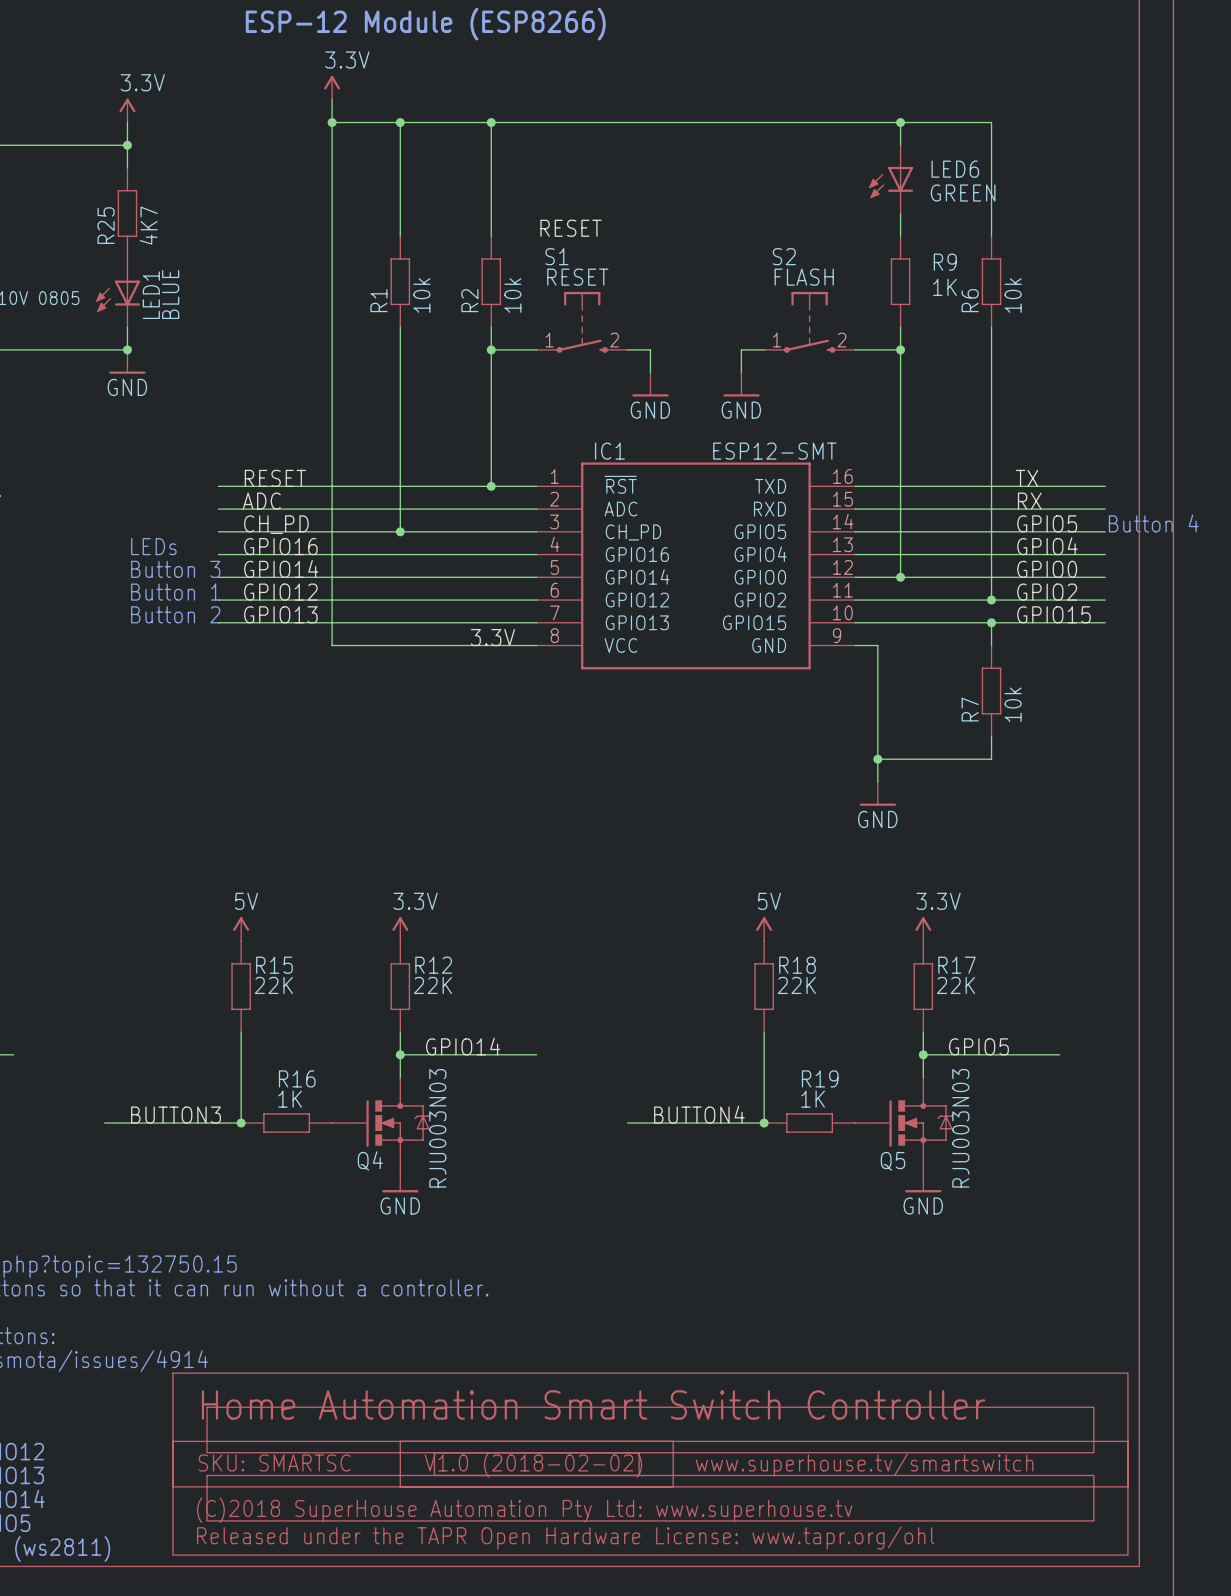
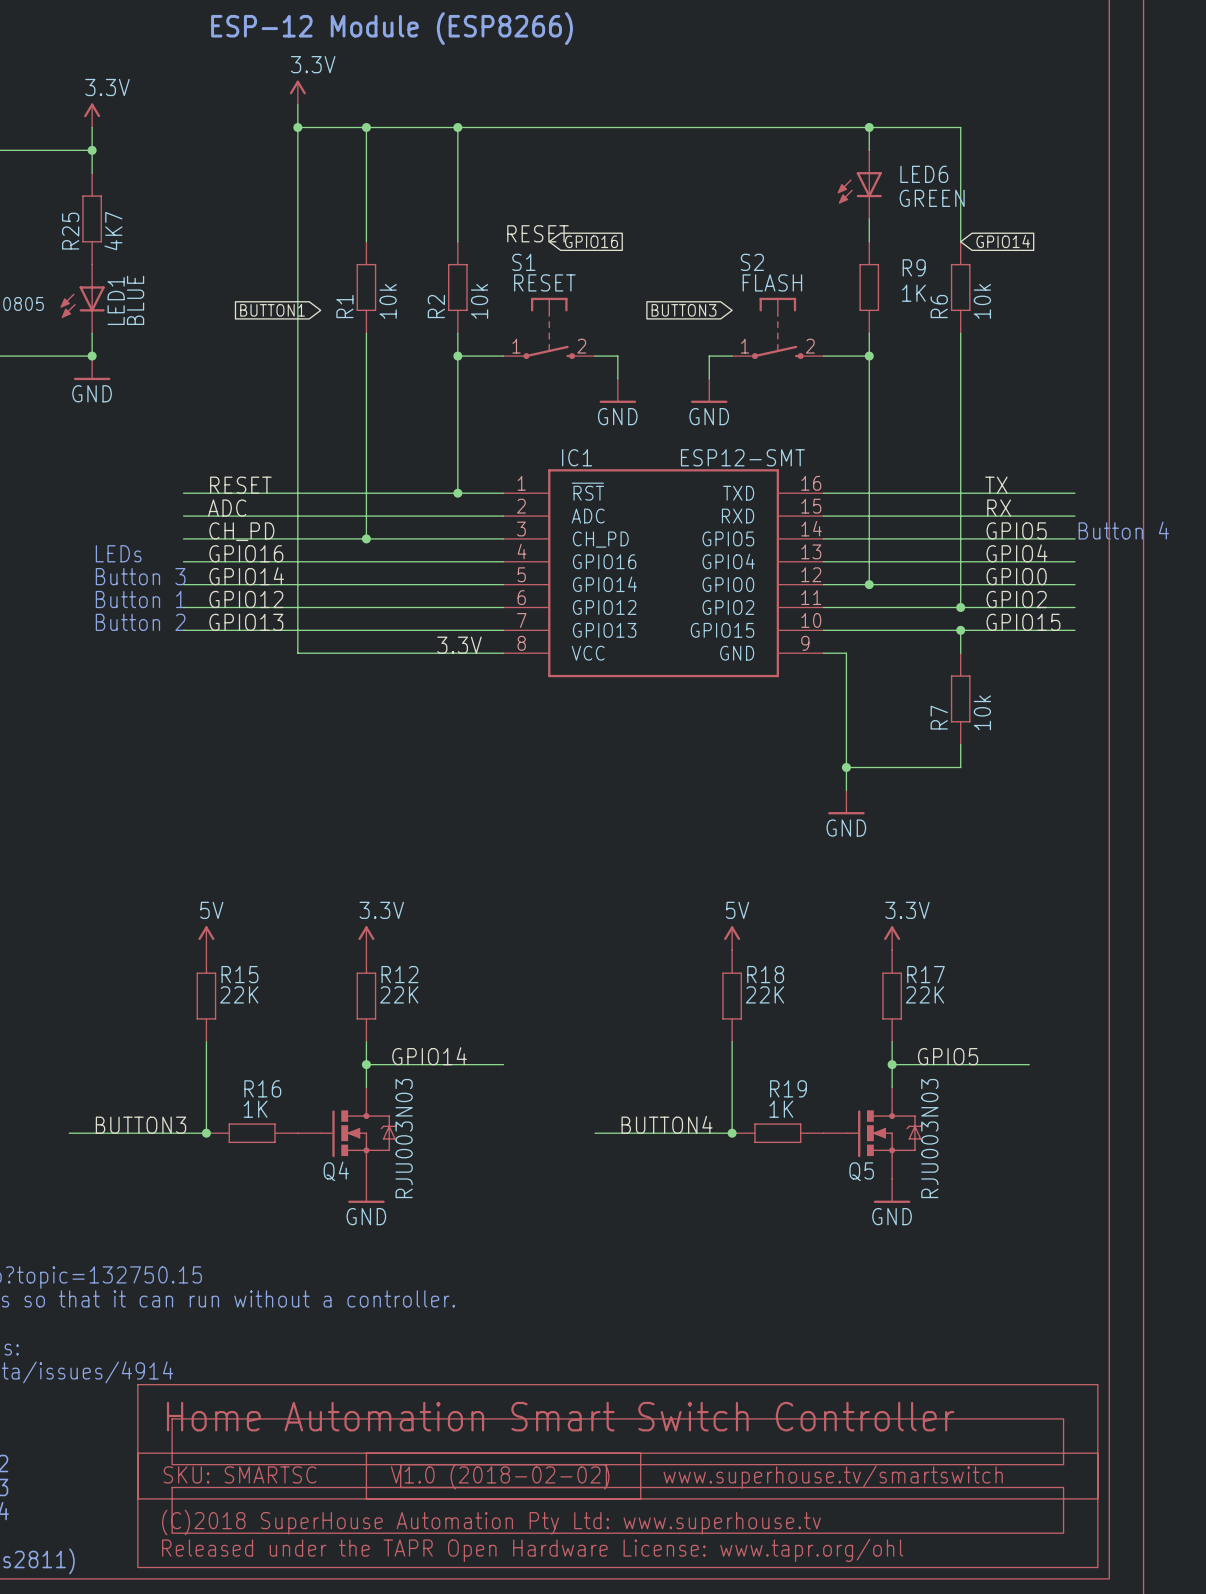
global label: none -> GPIO14 (1003, 241)
global label: none -> GPIO16 (591, 241)
global label: none -> BUTTON1 (272, 310)
global label: none -> BUTTON3 (684, 310)

